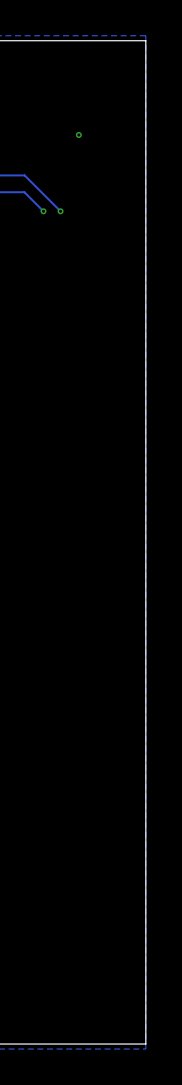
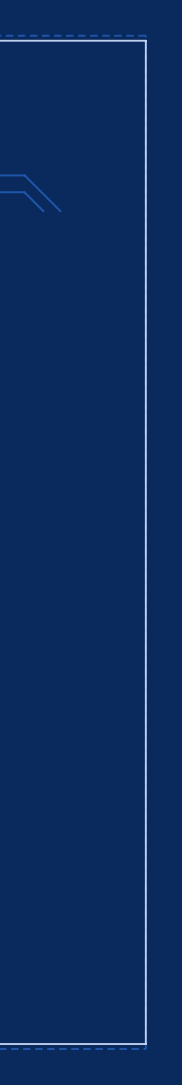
via: (78, 134) -> none
via: (43, 211) -> none
via: (60, 211) -> none

